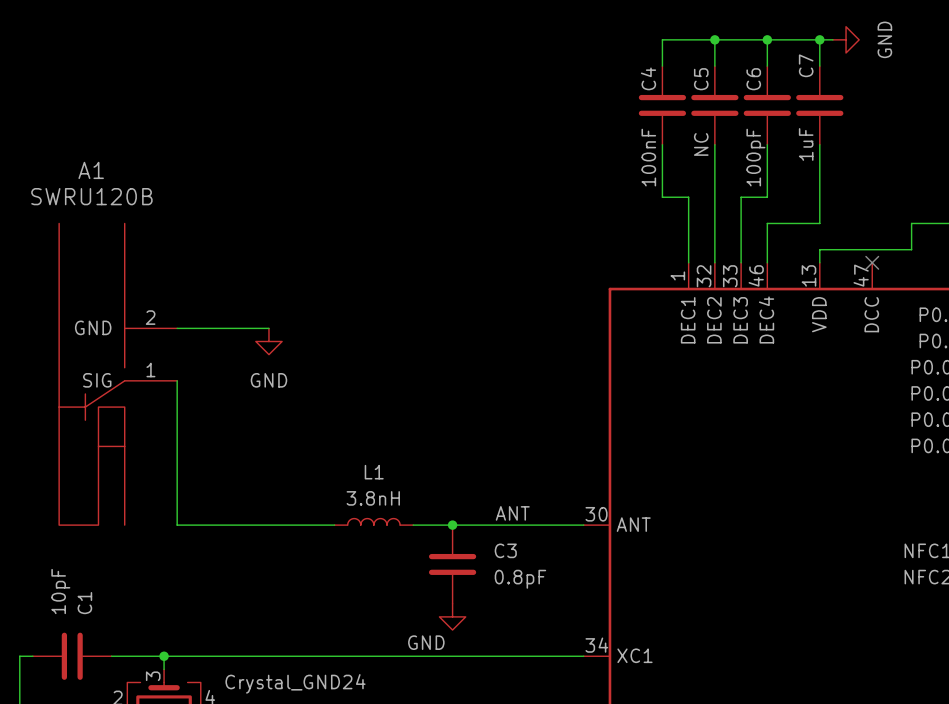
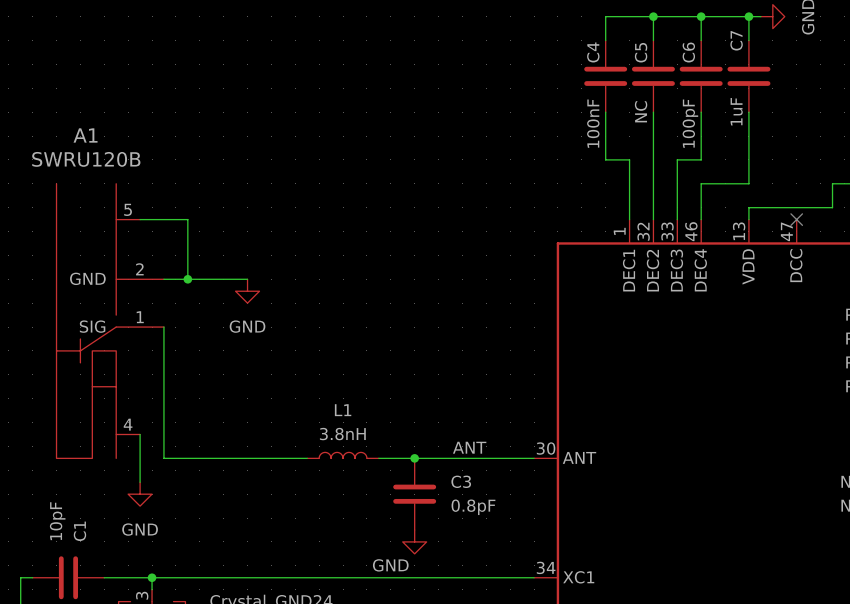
A1 symbol: [59, 223, 178, 526] -> [56, 183, 164, 459]
wire: none -> (140, 219) (187, 219) (187, 279)
junction: none -> (187, 279)
wire: none -> (140, 434) (140, 482)
power symbol: none -> GND (140, 494)

